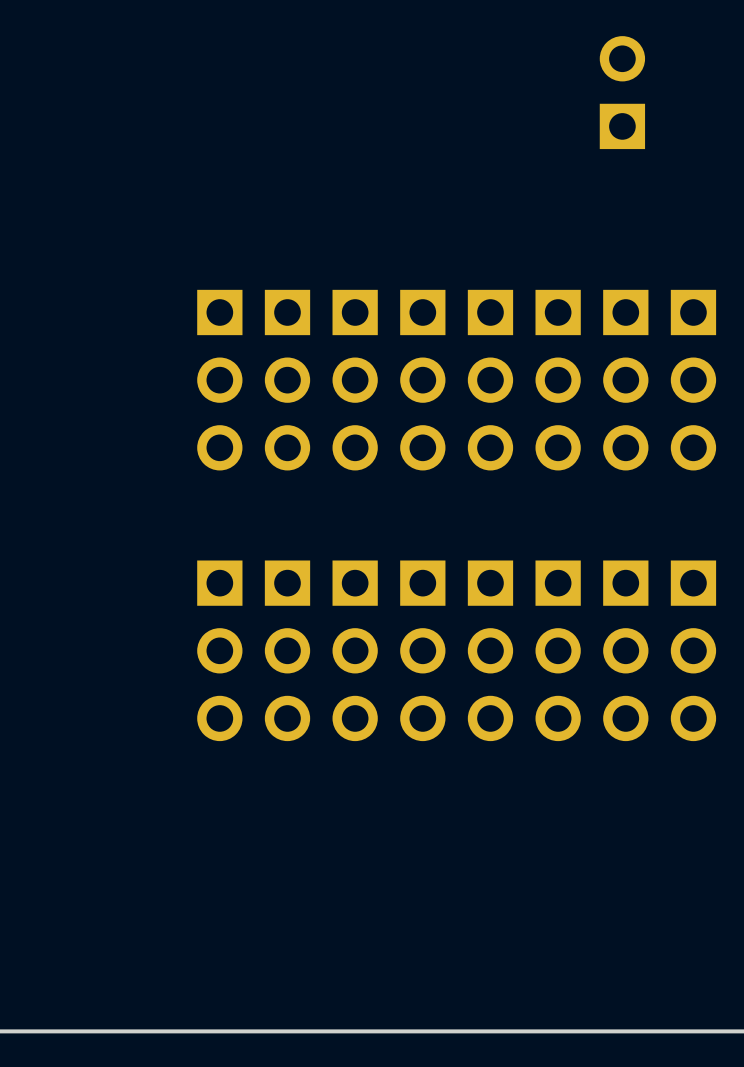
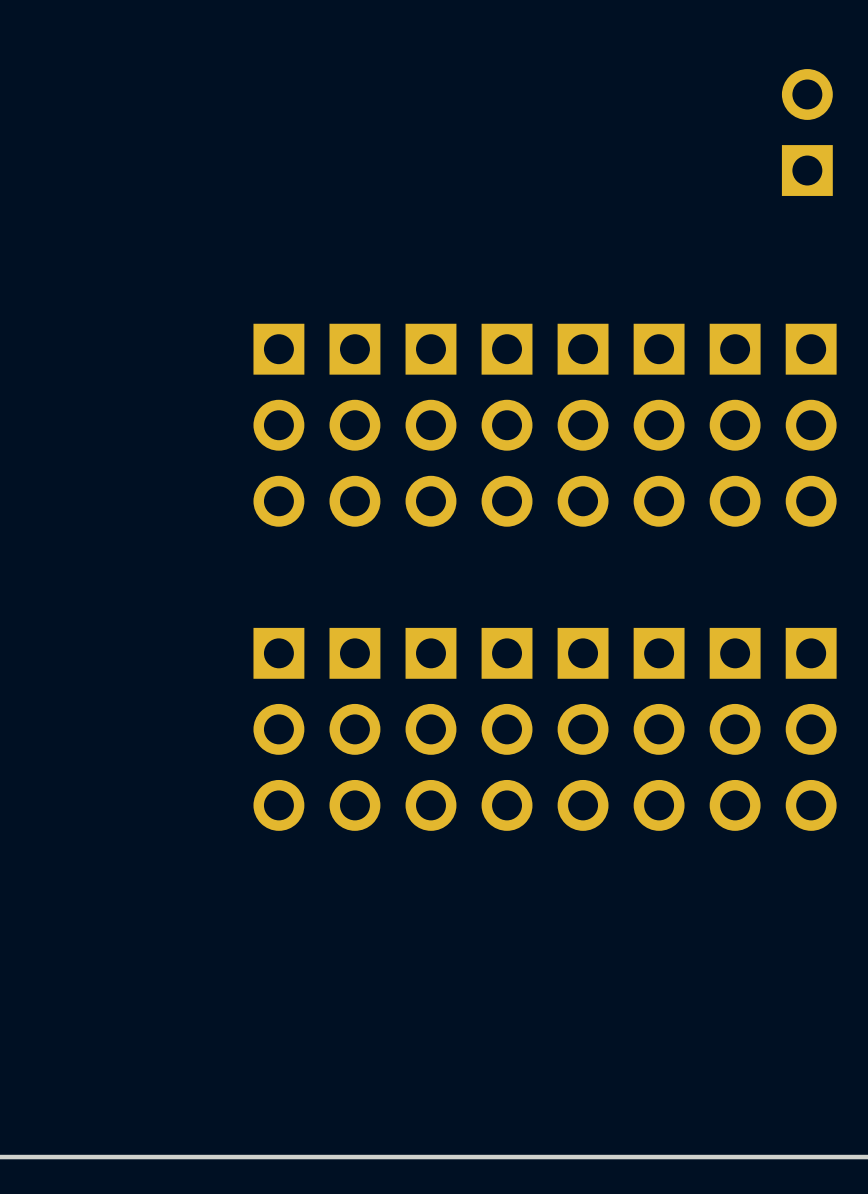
part position: (622, 92) -> (807, 132)

